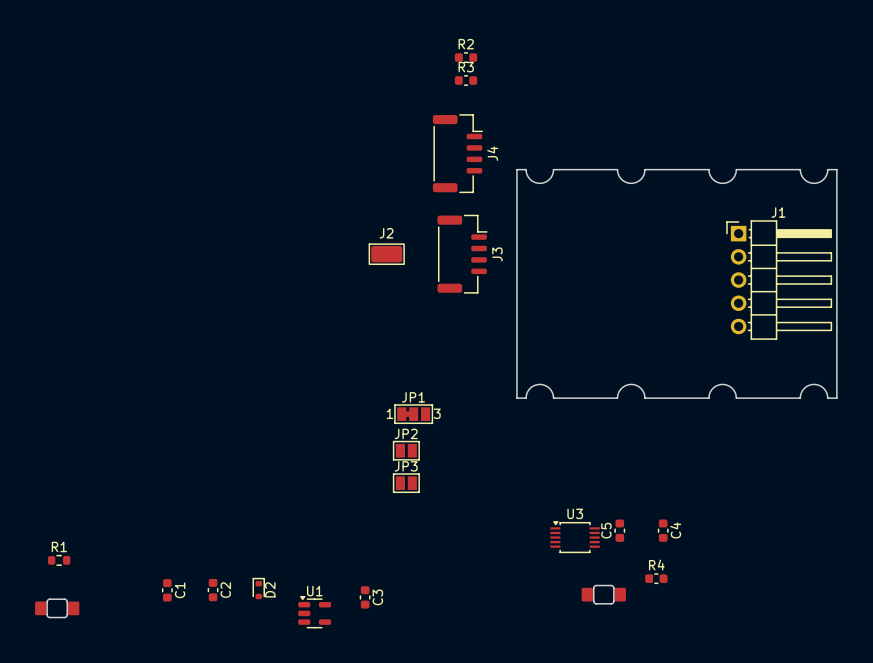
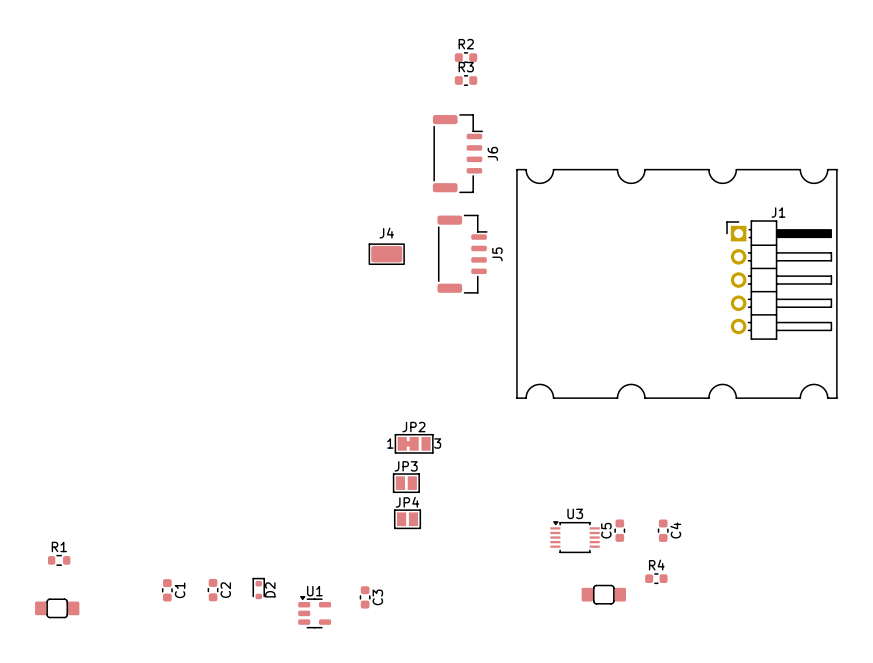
J4 name: J4 (492, 153) -> J6 (492, 153)
J2 name: J2 (386, 233) -> J4 (386, 233)
J3 name: J3 (497, 254) -> J5 (497, 254)
JP1: (413, 414) -> none
JP2 footprint: [393, 441, 420, 461] -> [394, 434, 434, 454]
JP4: none -> (407, 519)

